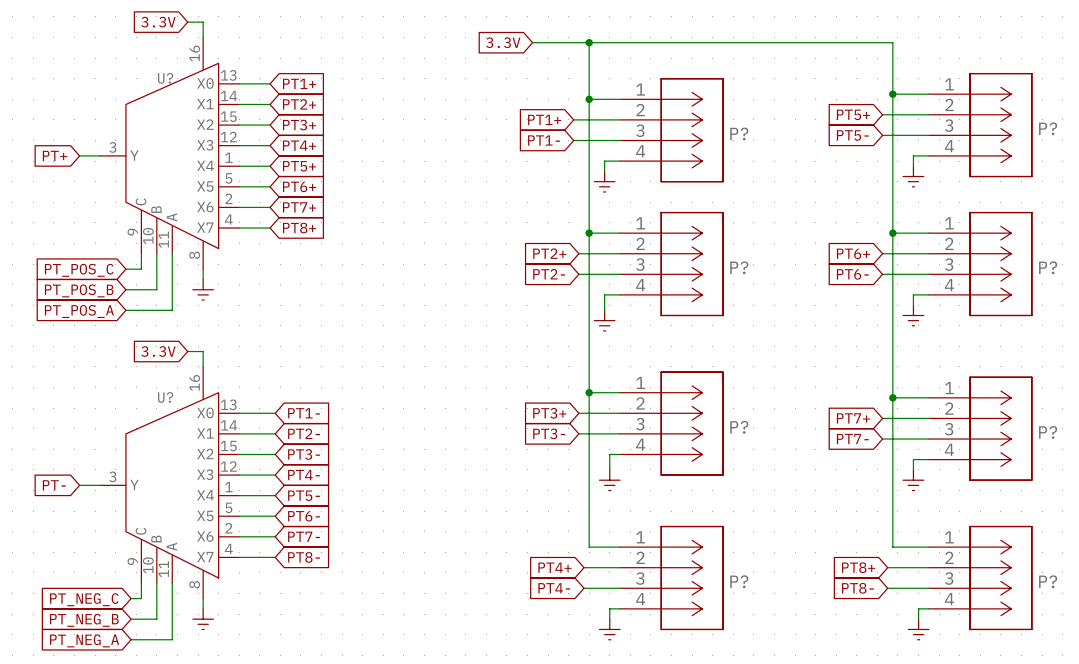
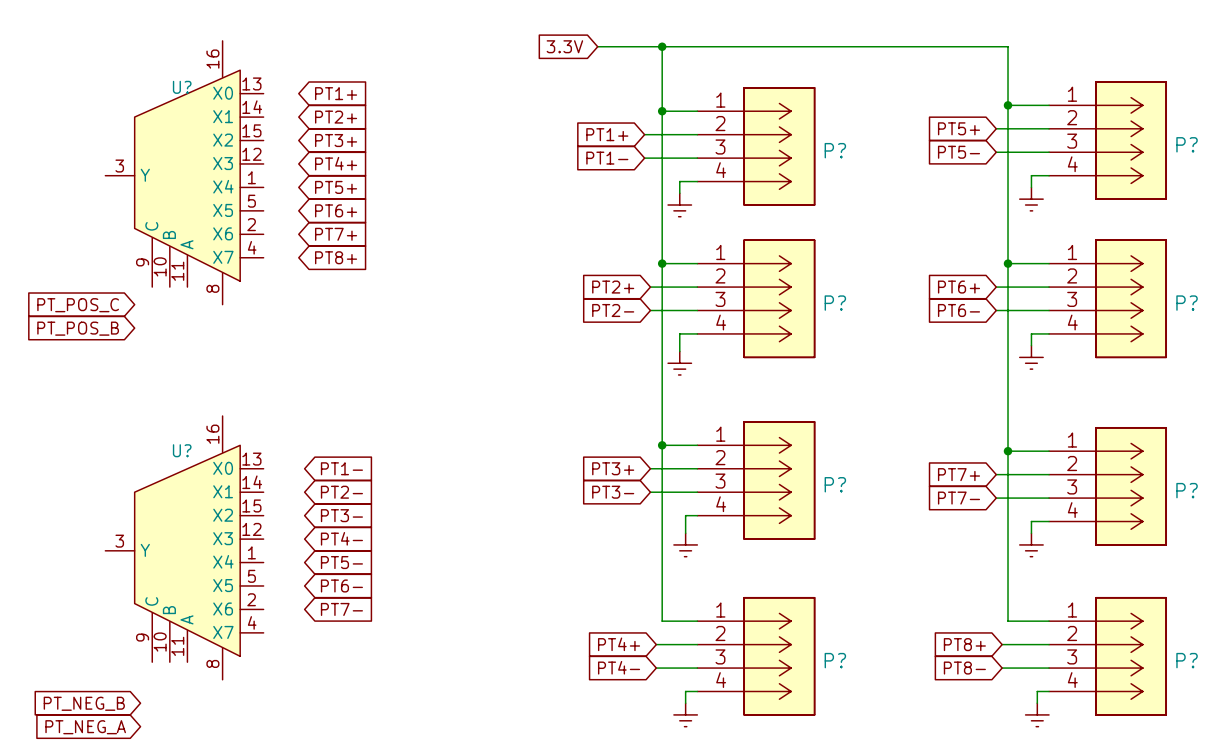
global label: 3.3V (158, 22) -> none
wire: (187, 22) (203, 22) (203, 37) -> none
wire: (239, 83) (270, 83) -> none
wire: (239, 104) (270, 104) -> none
wire: (239, 125) (270, 125) -> none
wire: (239, 145) (270, 145) -> none
global label: PT+ (54, 155) -> none
wire: (79, 155) (100, 155) -> none
wire: (239, 166) (270, 166) -> none
wire: (239, 186) (270, 186) -> none
wire: (239, 207) (270, 207) -> none
wire: (239, 228) (270, 228) -> none
wire: (141, 253) (141, 269) (125, 269) -> none
wire: (156, 253) (156, 289) (125, 289) -> none
wire: (172, 253) (172, 310) (125, 310) -> none
wire: (203, 269) (203, 279) -> none
power symbol: (203, 289) -> none
global label: PT_POS_A (79, 311) -> none
global label: 3.3V (158, 351) -> none
wire: (187, 351) (203, 351) (203, 366) -> none
wire: (239, 413) (275, 413) -> none
wire: (239, 433) (275, 433) -> none
wire: (239, 454) (275, 454) -> none
wire: (239, 475) (275, 475) -> none
global label: PT- (54, 485) -> none
wire: (79, 485) (100, 485) -> none
wire: (239, 495) (275, 495) -> none
wire: (239, 516) (275, 516) -> none
wire: (239, 536) (275, 536) -> none
wire: (239, 557) (275, 557) -> none
global label: PT8- (304, 557) -> none
wire: (141, 583) (141, 598) (131, 598) -> none
wire: (156, 583) (156, 619) (131, 619) -> none
wire: (172, 583) (172, 639) (131, 639) -> none
wire: (203, 598) (203, 608) -> none
global label: PT_NEG_C (84, 599) -> none
power symbol: (203, 619) -> none

